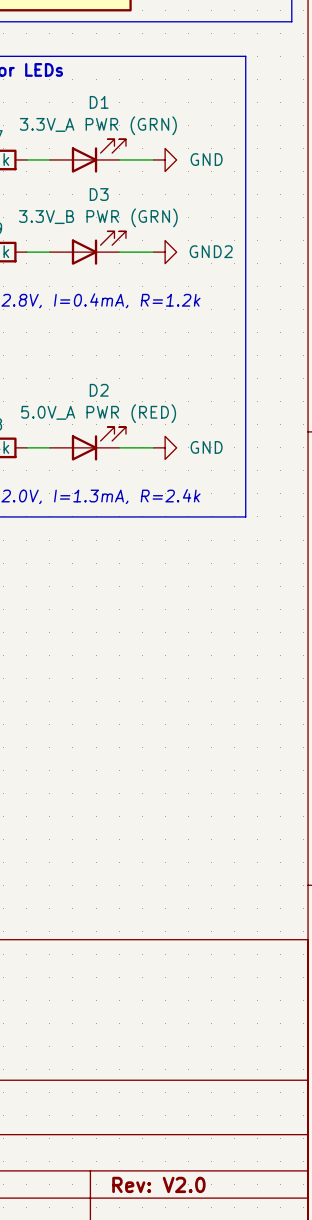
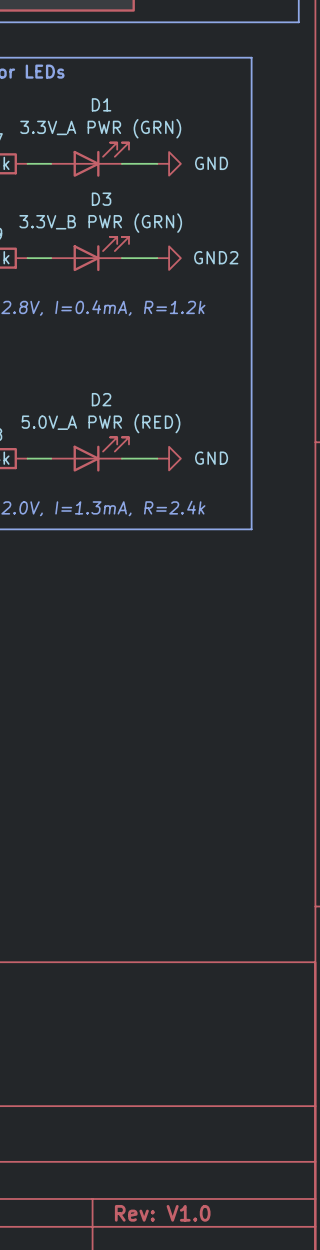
title block: Rev: V2.0 (158, 1184) -> Rev: V1.0 (162, 1213)

